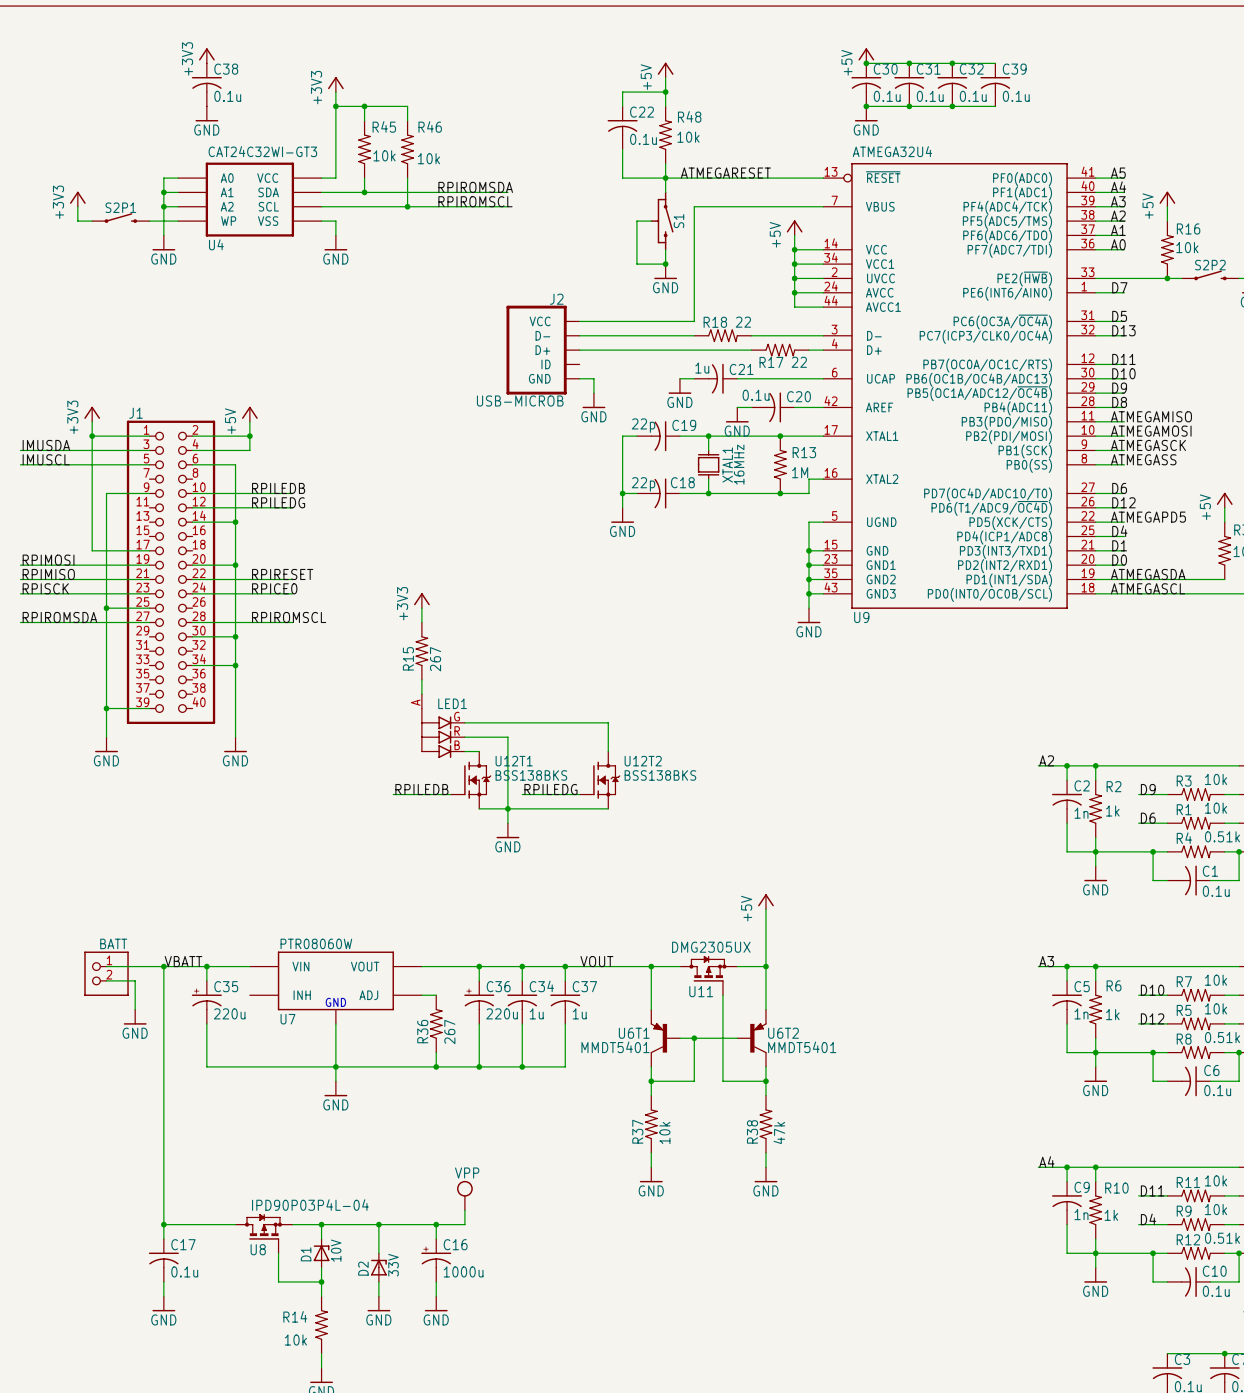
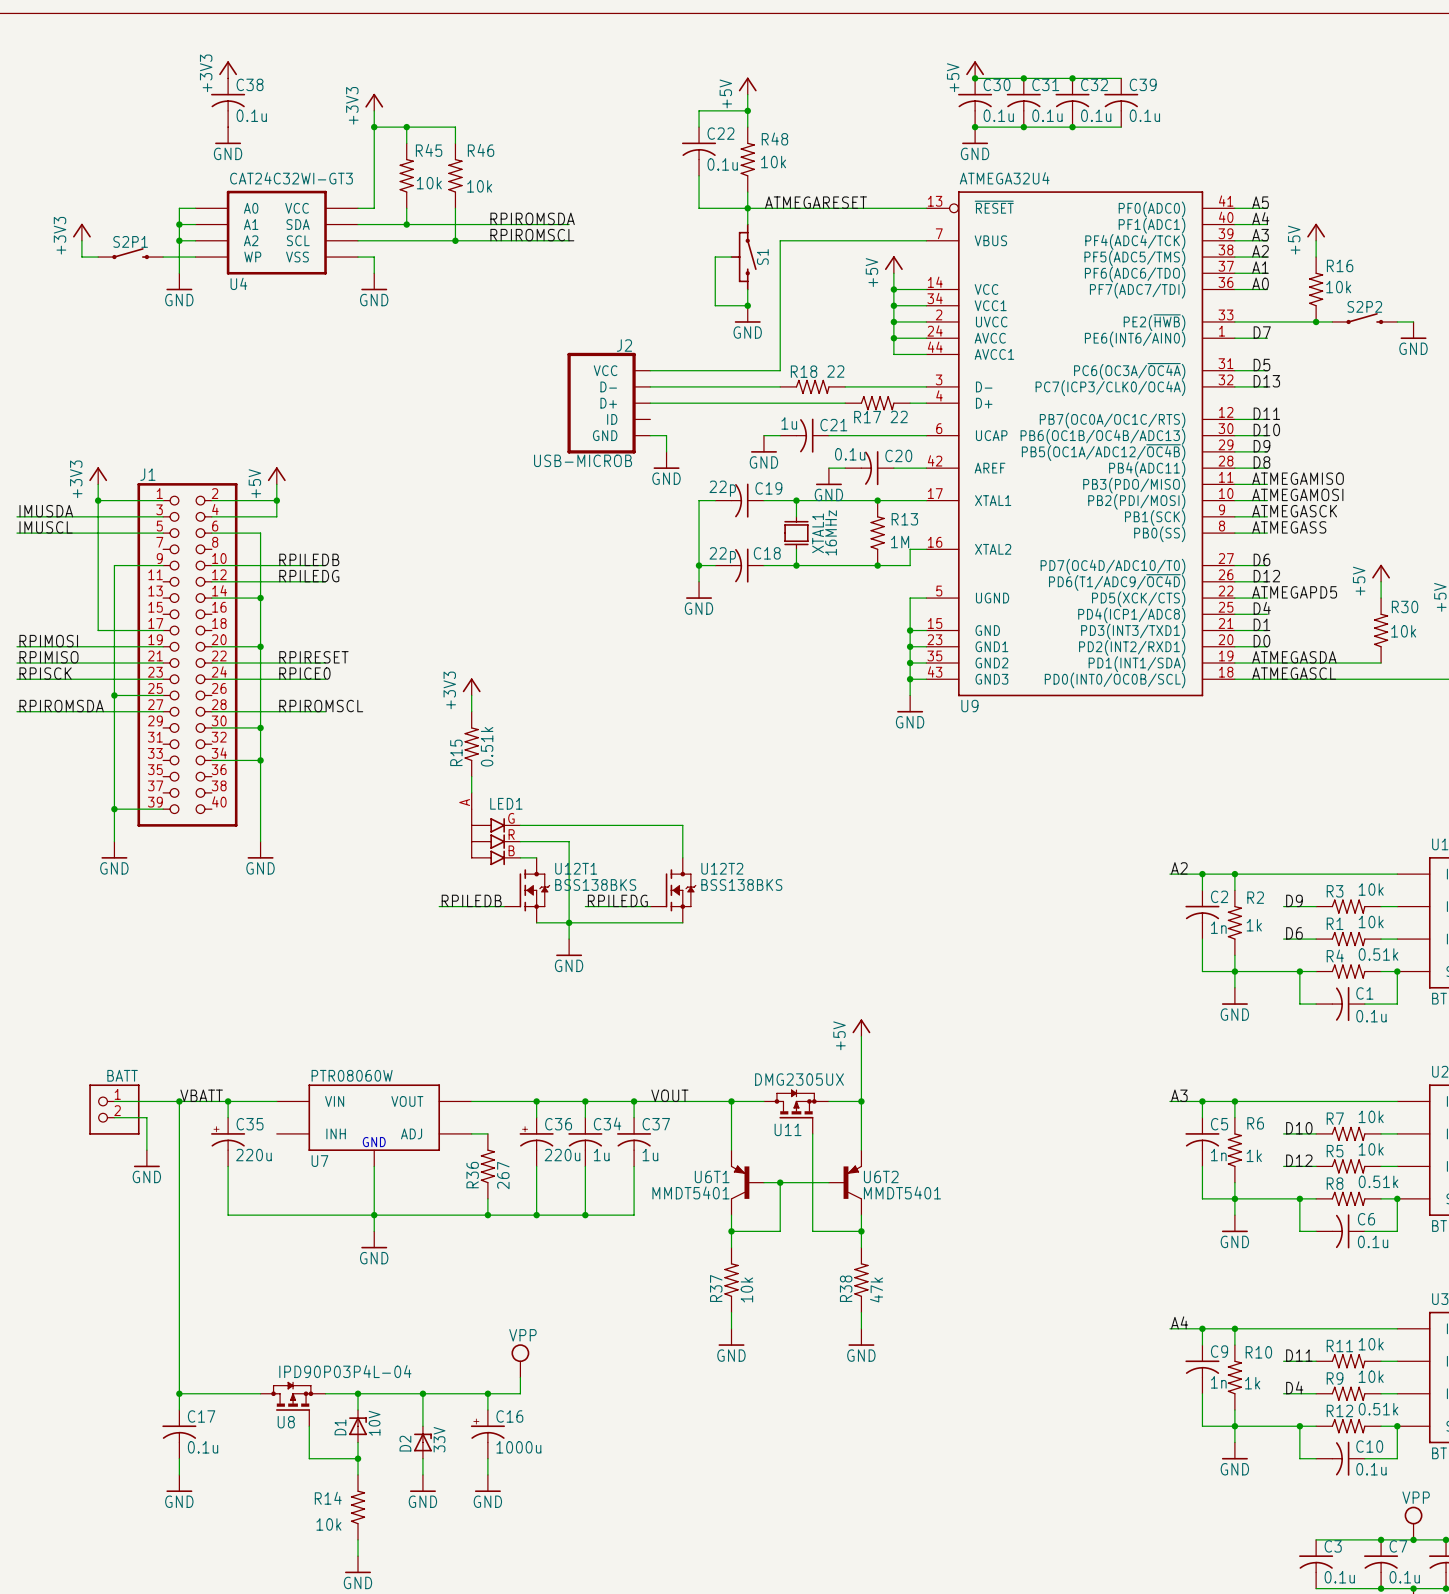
R15 value: 267 (435, 659) -> 0.51k (487, 746)

